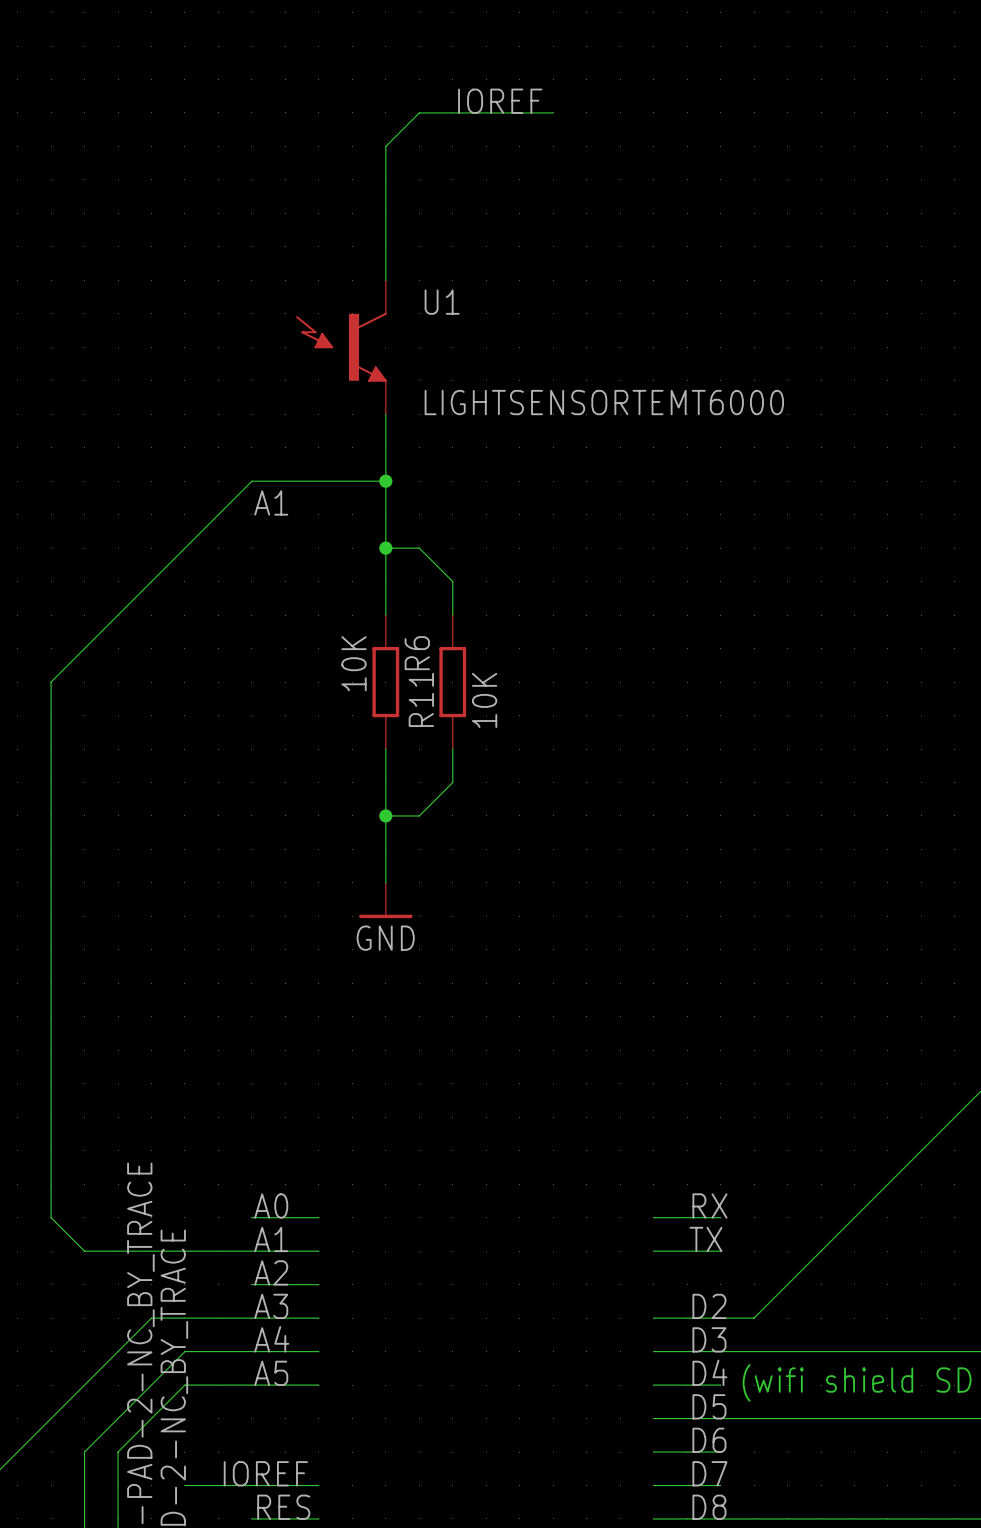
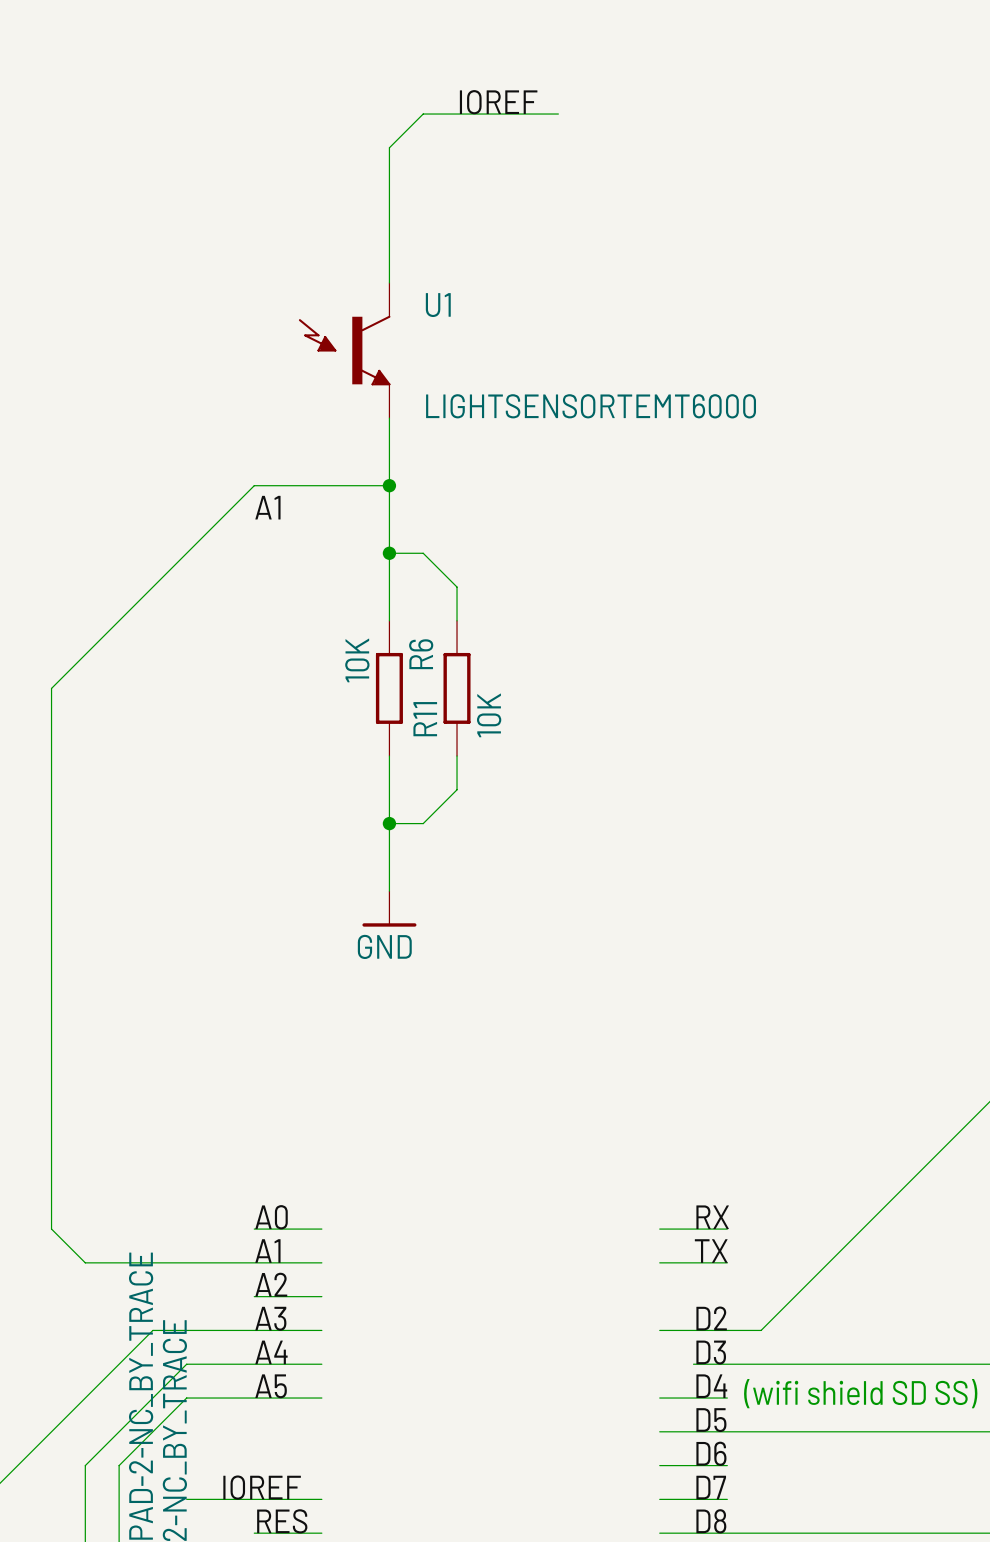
wire: (653, 1351) (687, 1351) -> none

